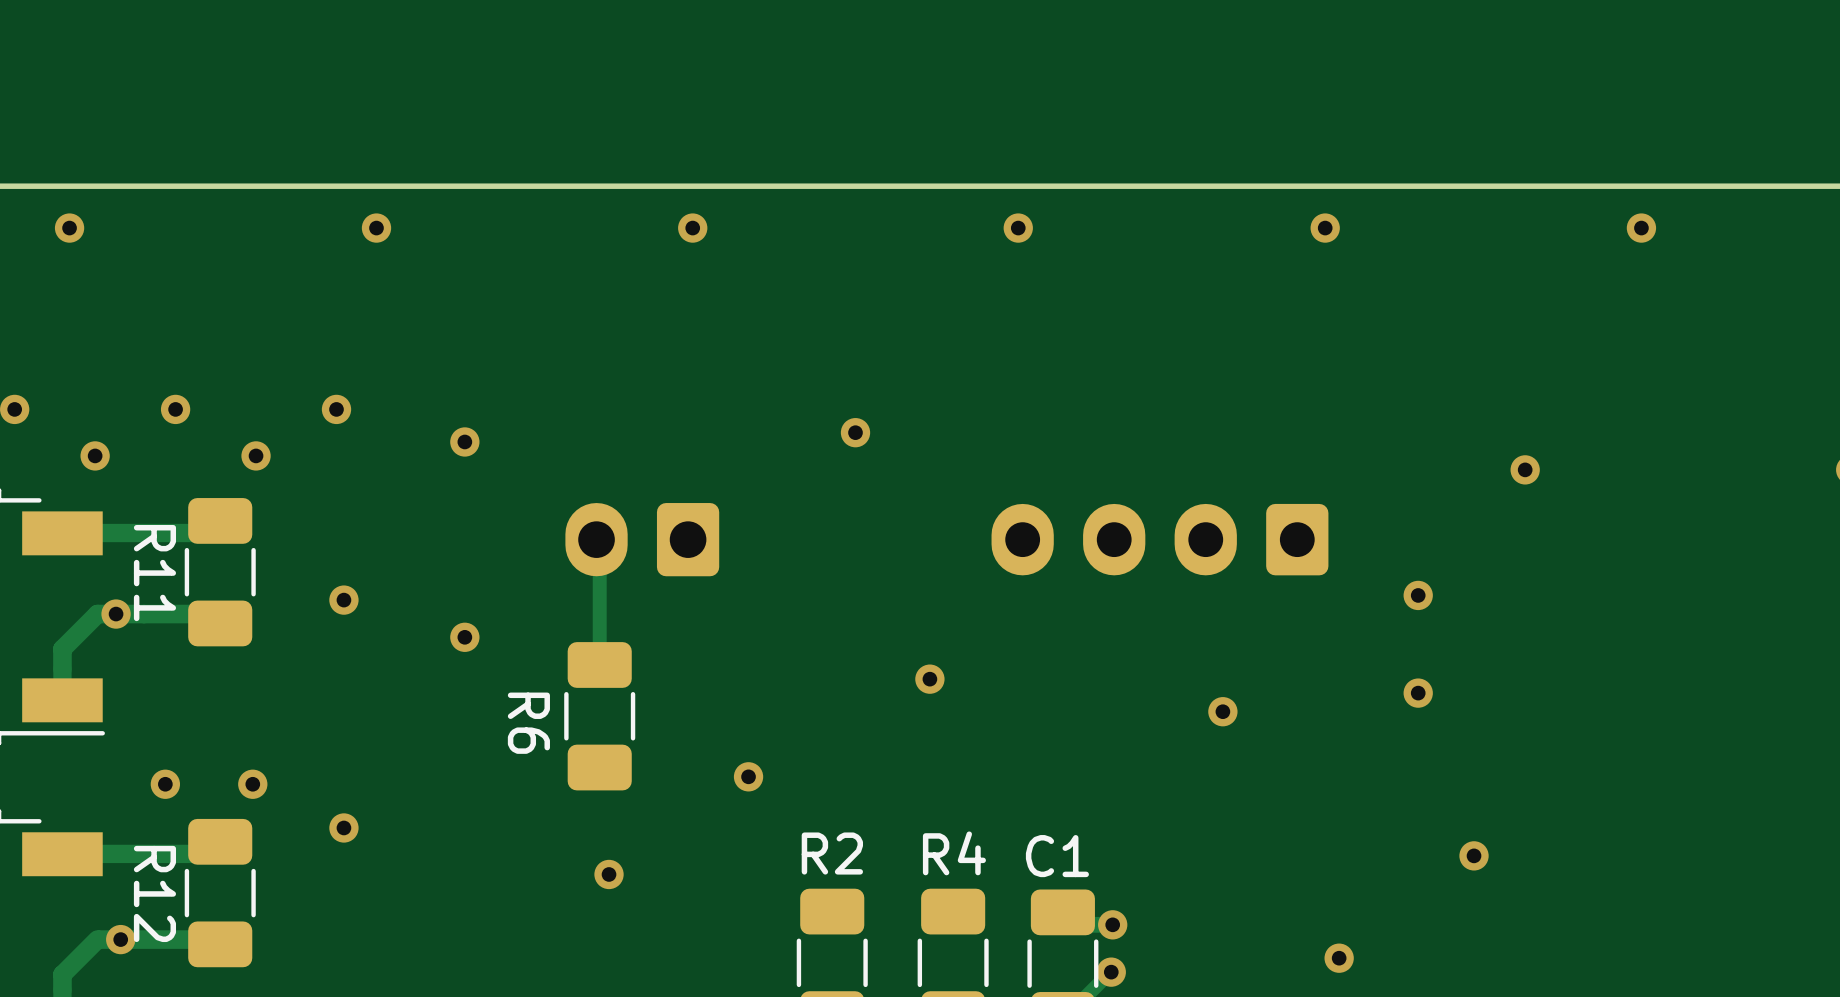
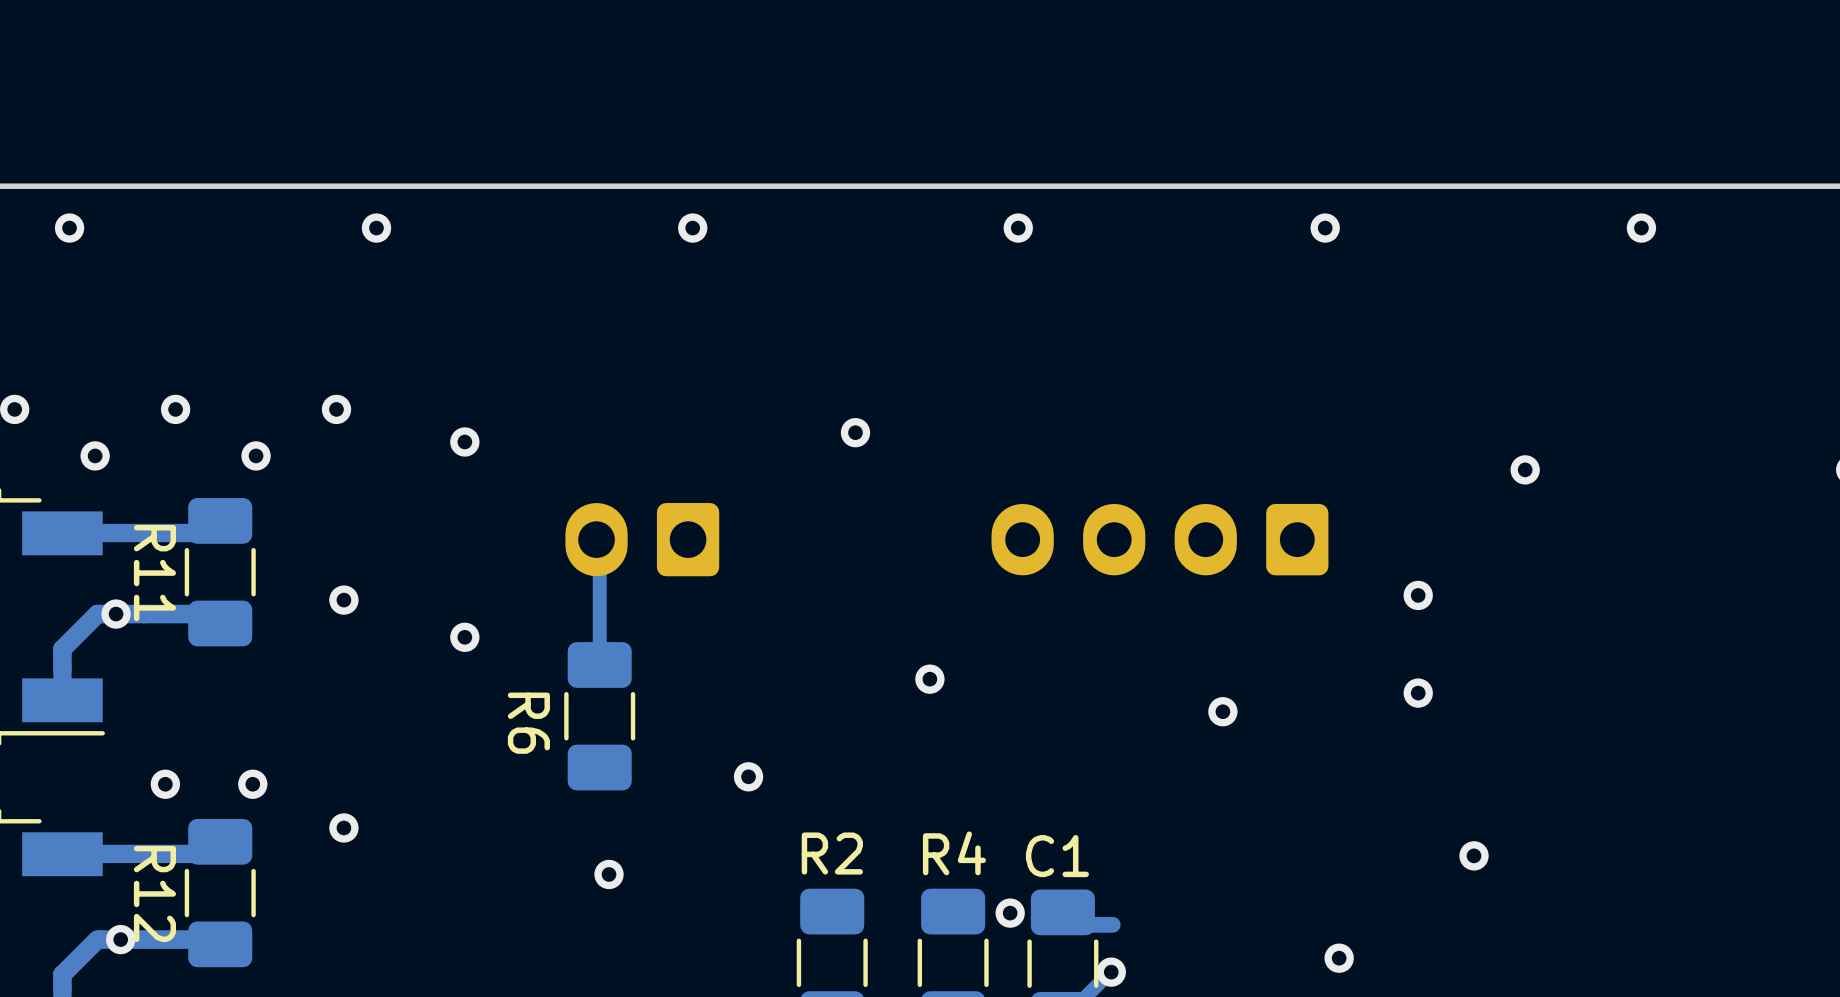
via position: (1112, 924) -> (1010, 913)

